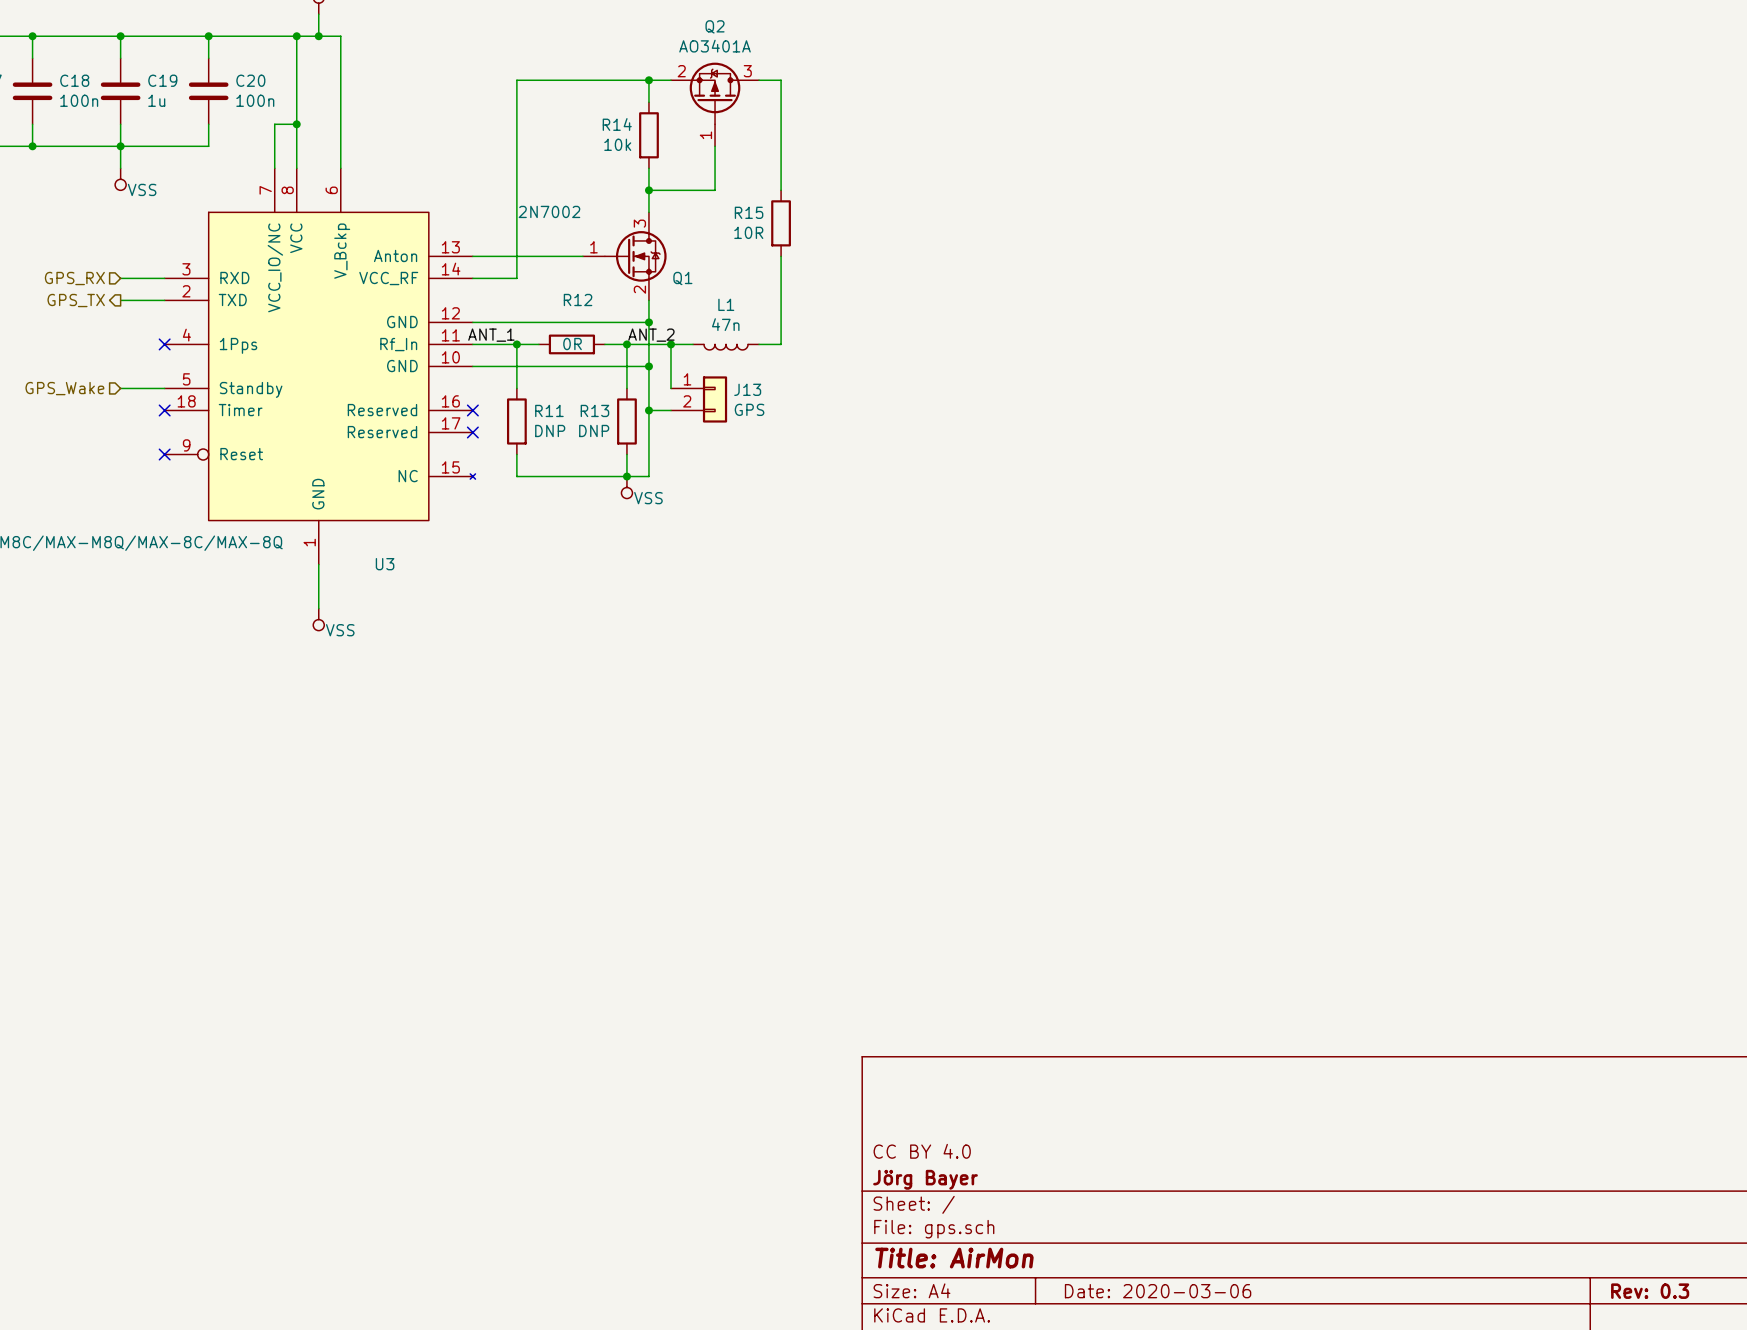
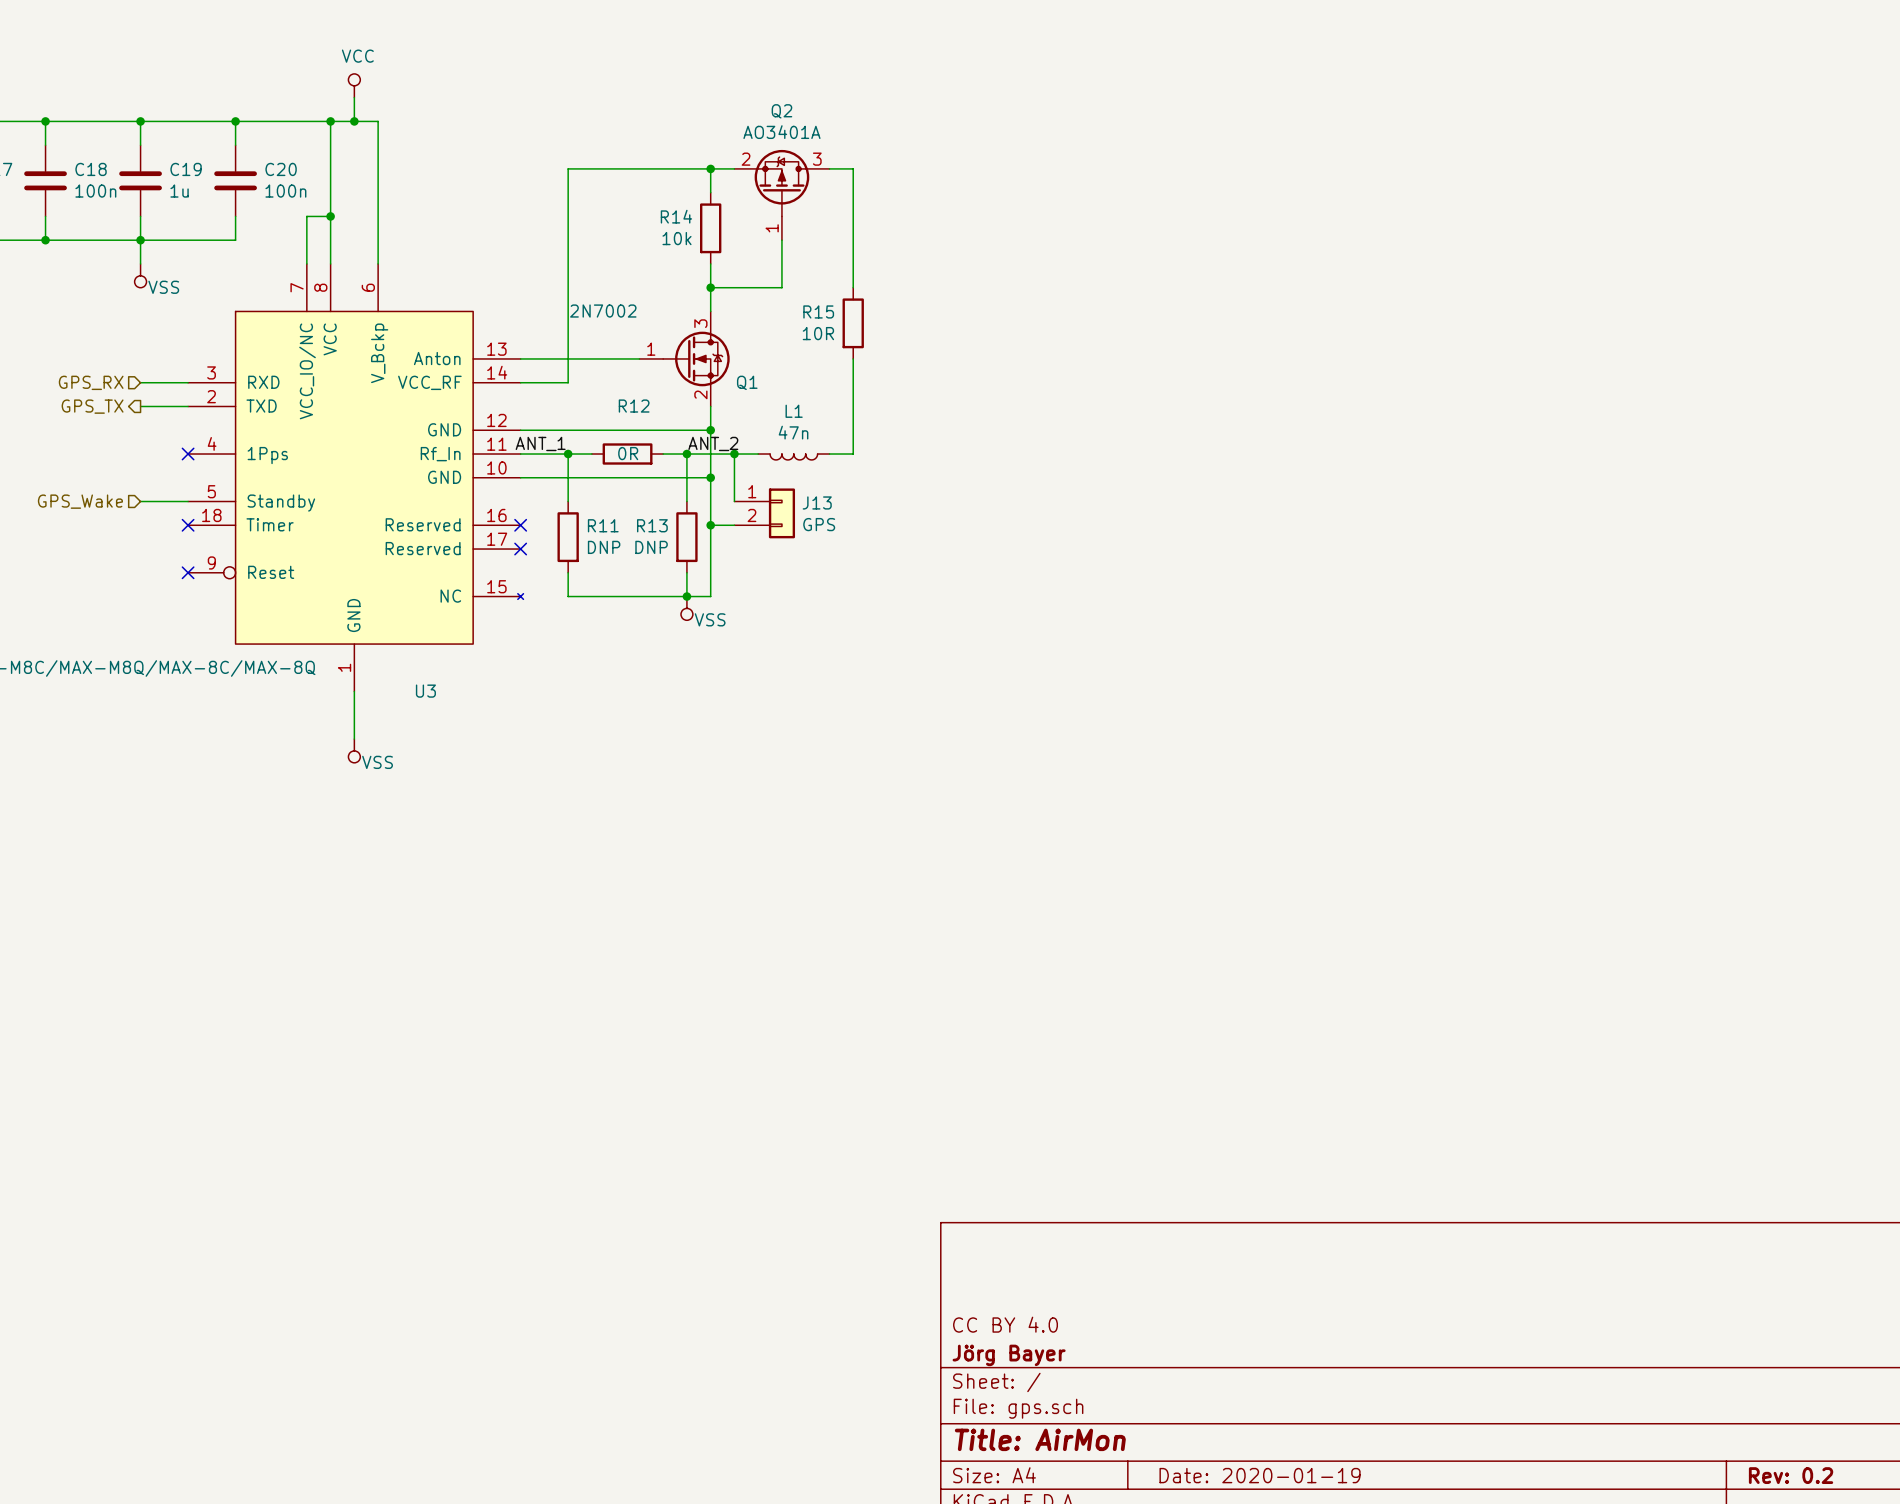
title block: Date: 2020-03-06 (1158, 1291) -> Date: 2020-01-19 (1260, 1475)
title block: Rev: 0.3 (1650, 1291) -> Rev: 0.2 (1791, 1475)

